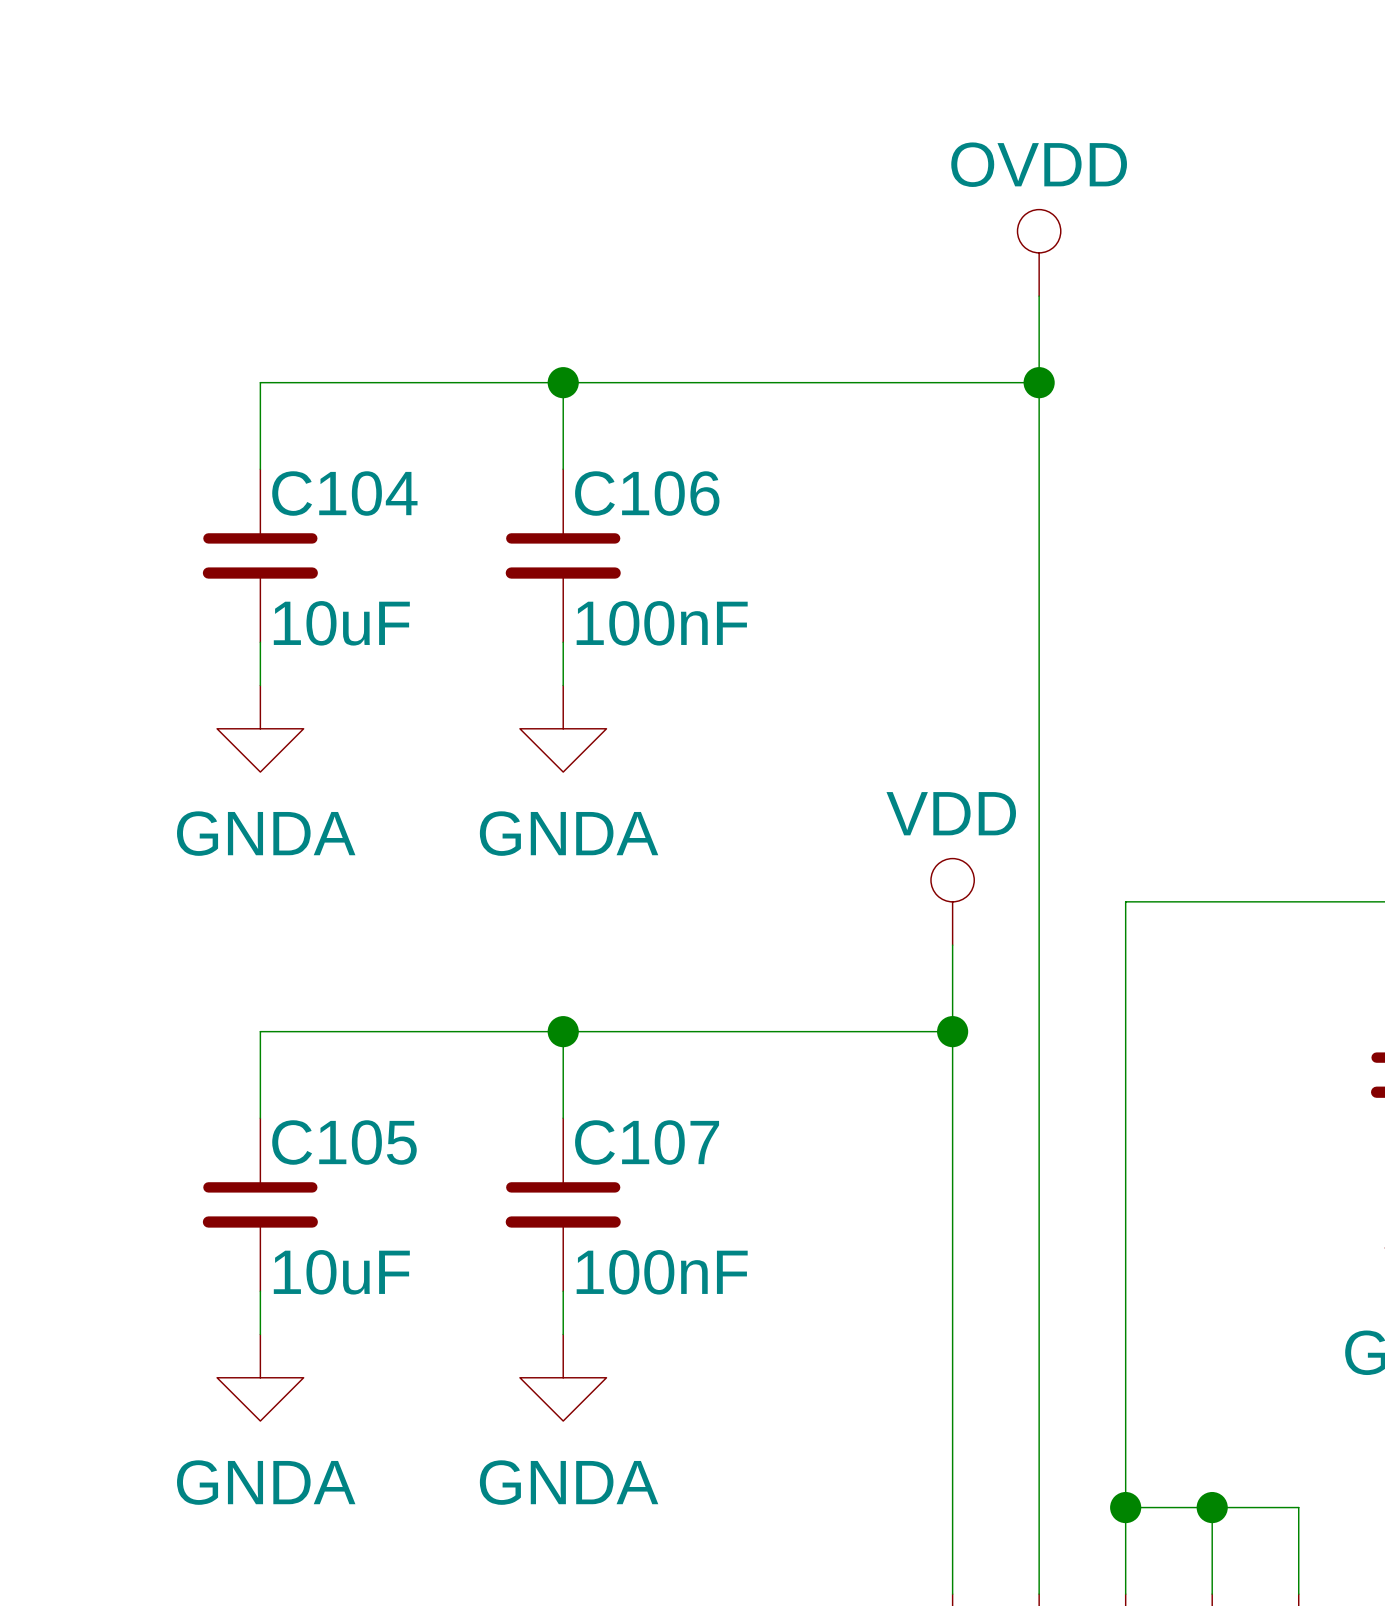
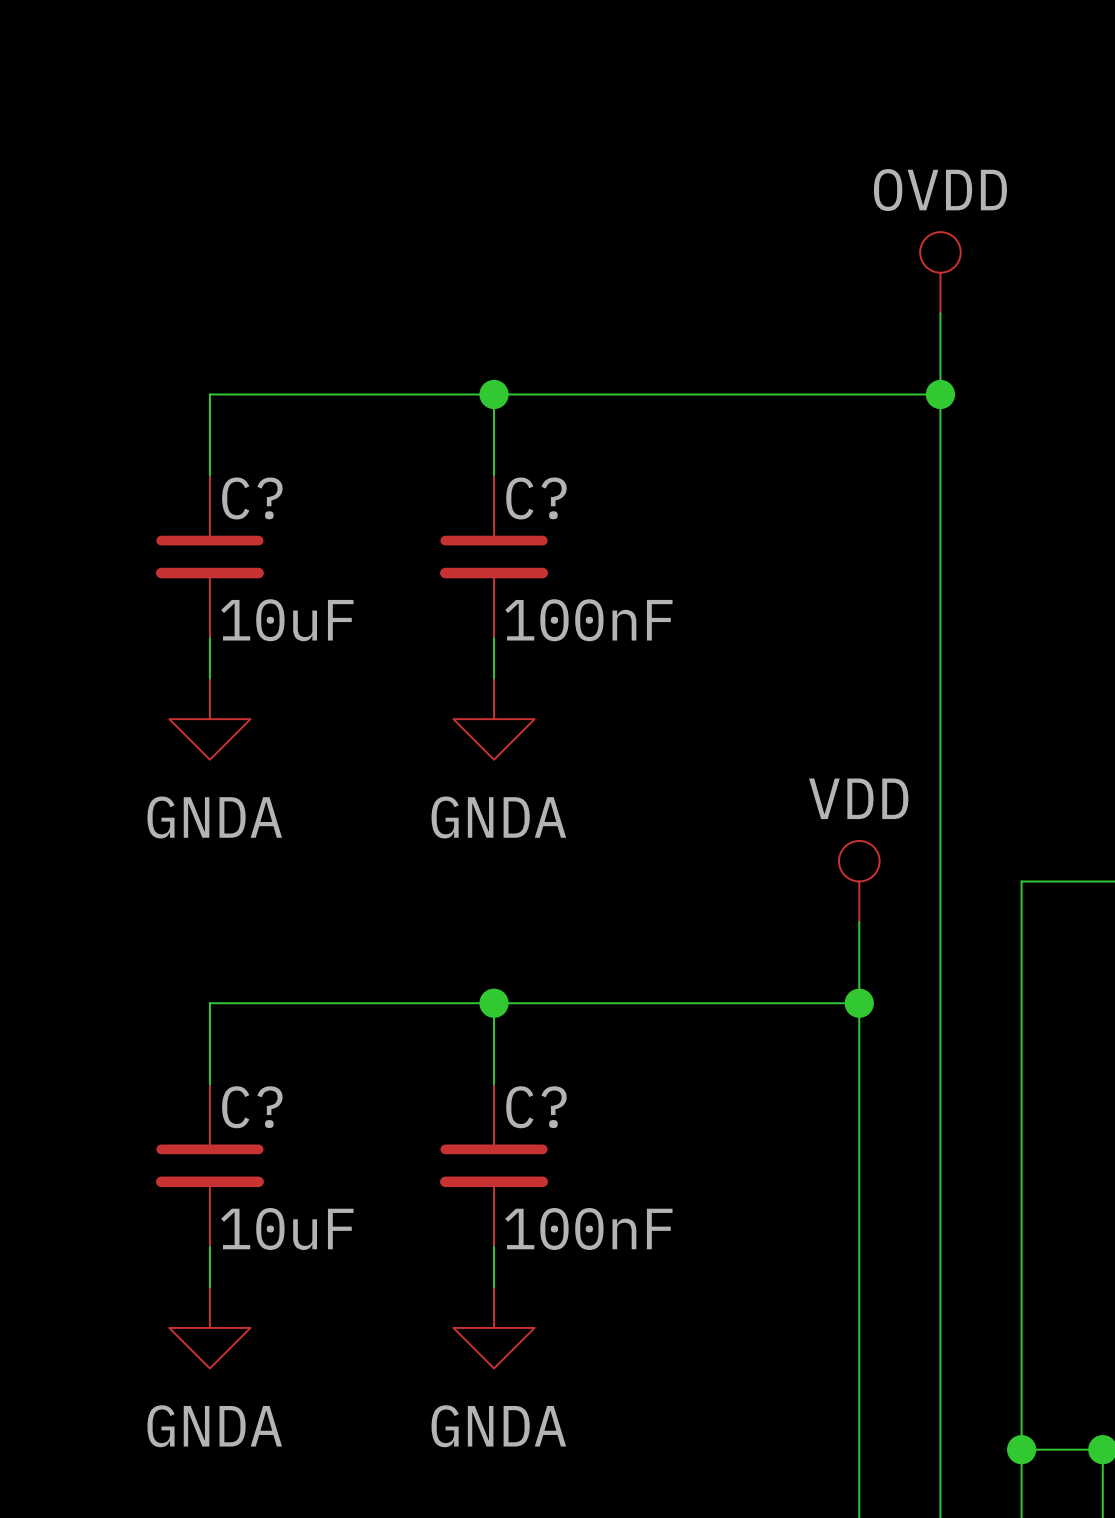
C104 name: C104 (344, 493) -> C? (252, 498)
C106 name: C106 (647, 493) -> C? (536, 498)
C105 name: C105 (344, 1142) -> C? (252, 1107)
C107 name: C107 (647, 1142) -> C? (536, 1107)

